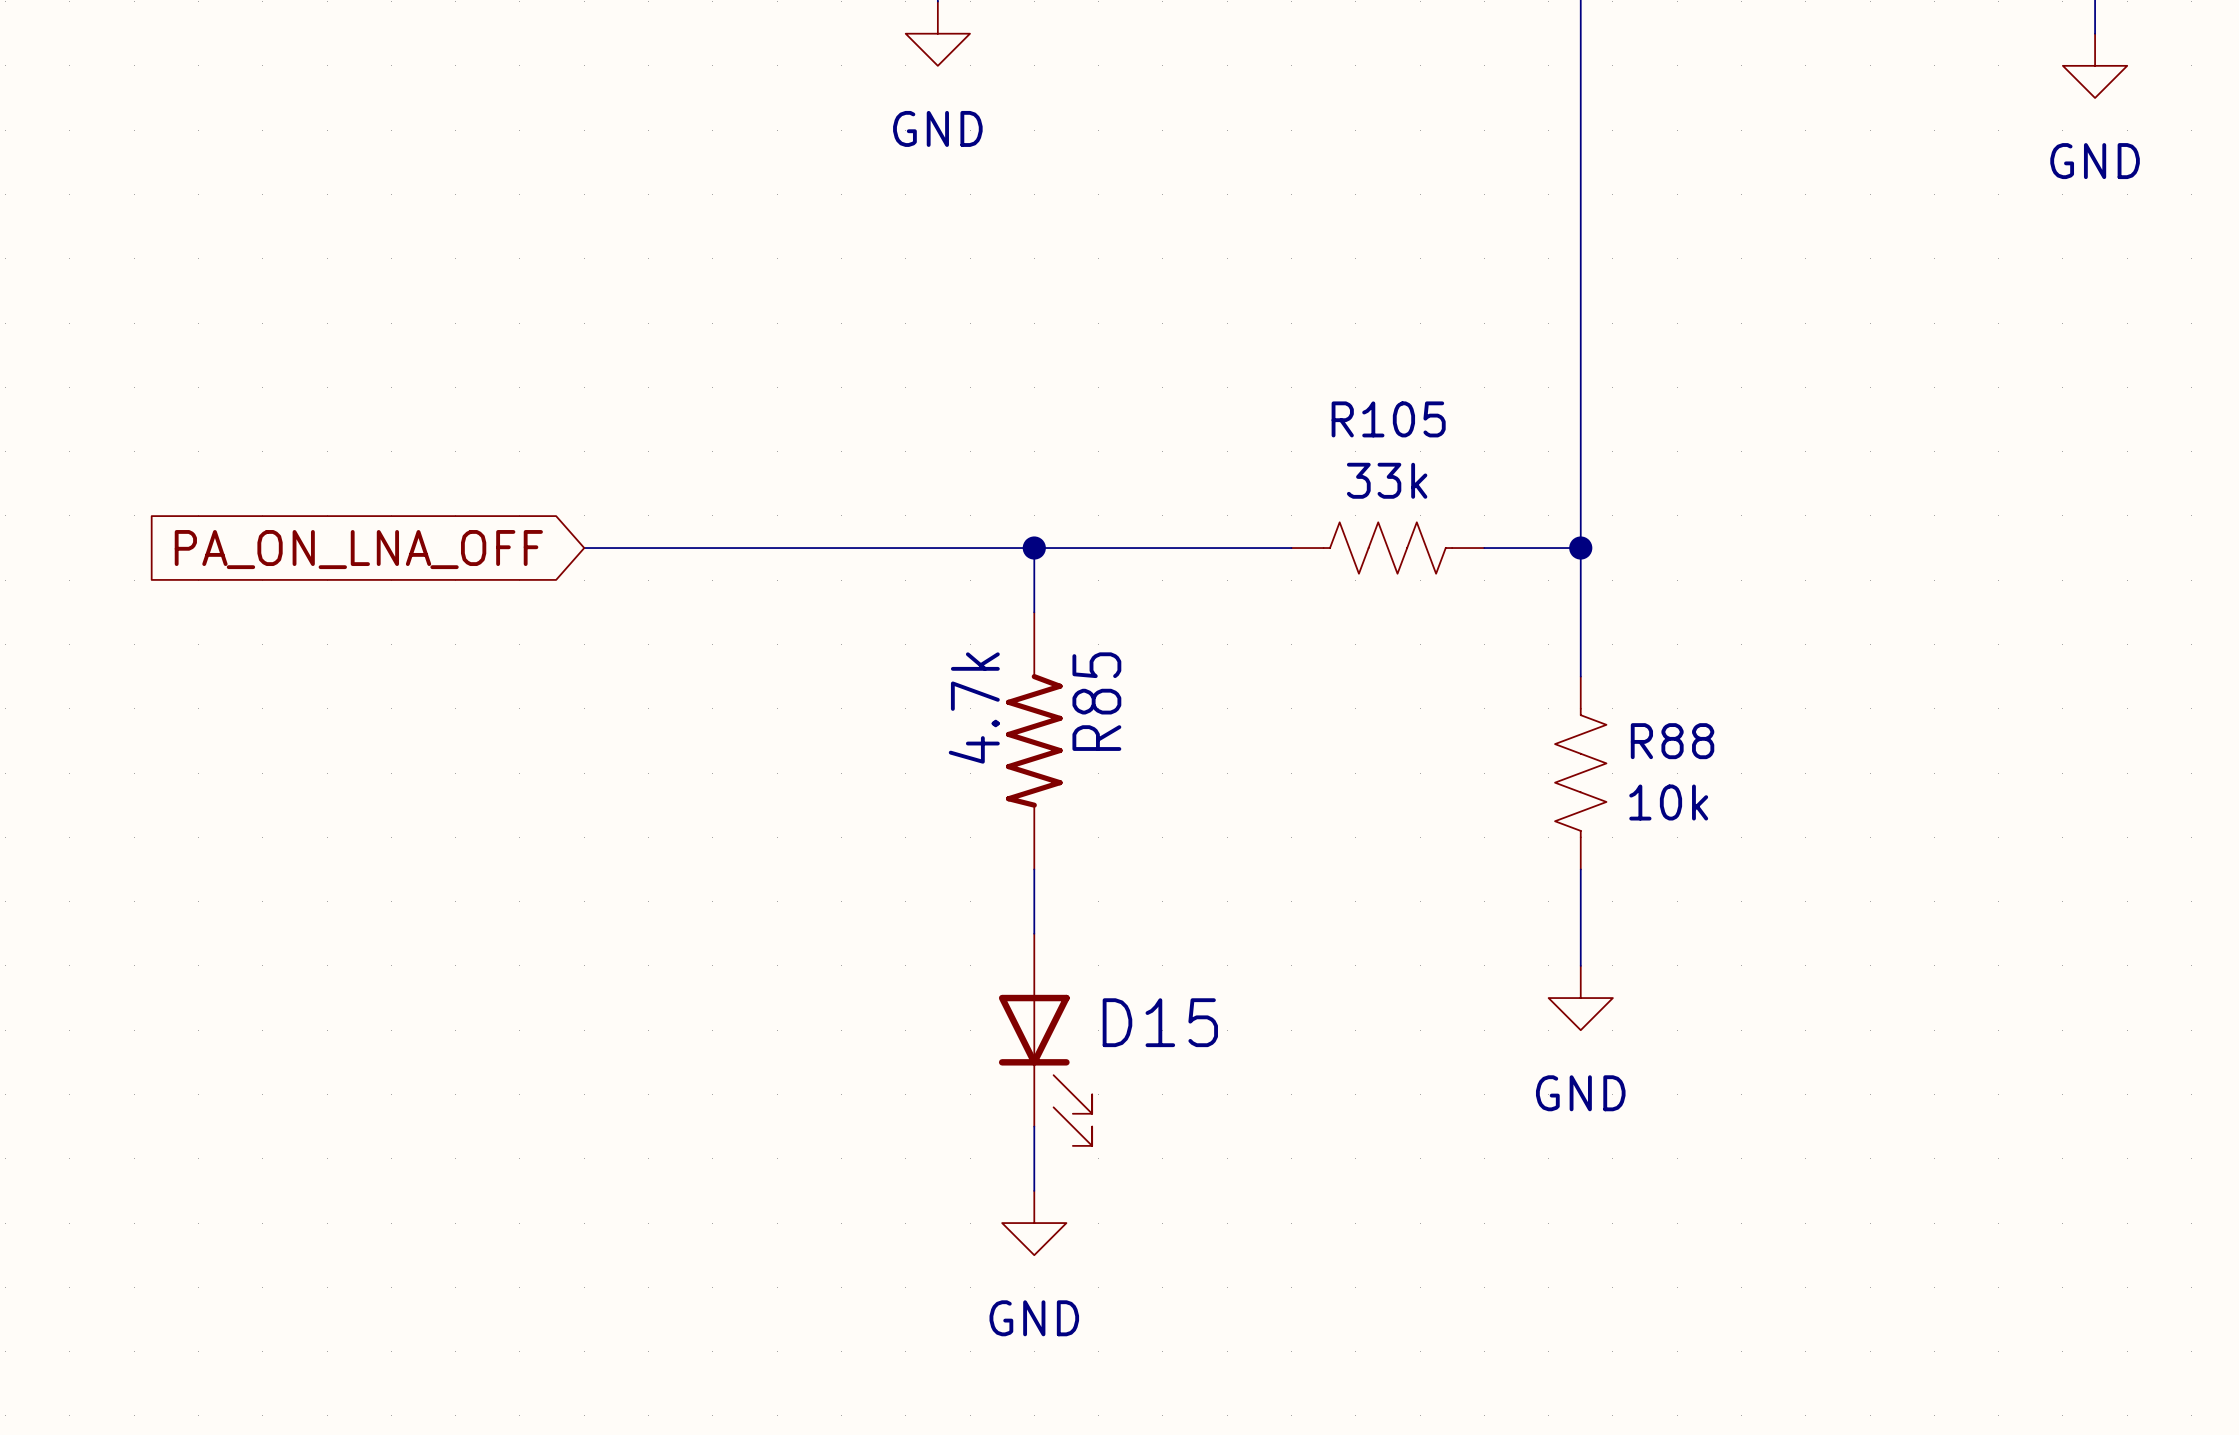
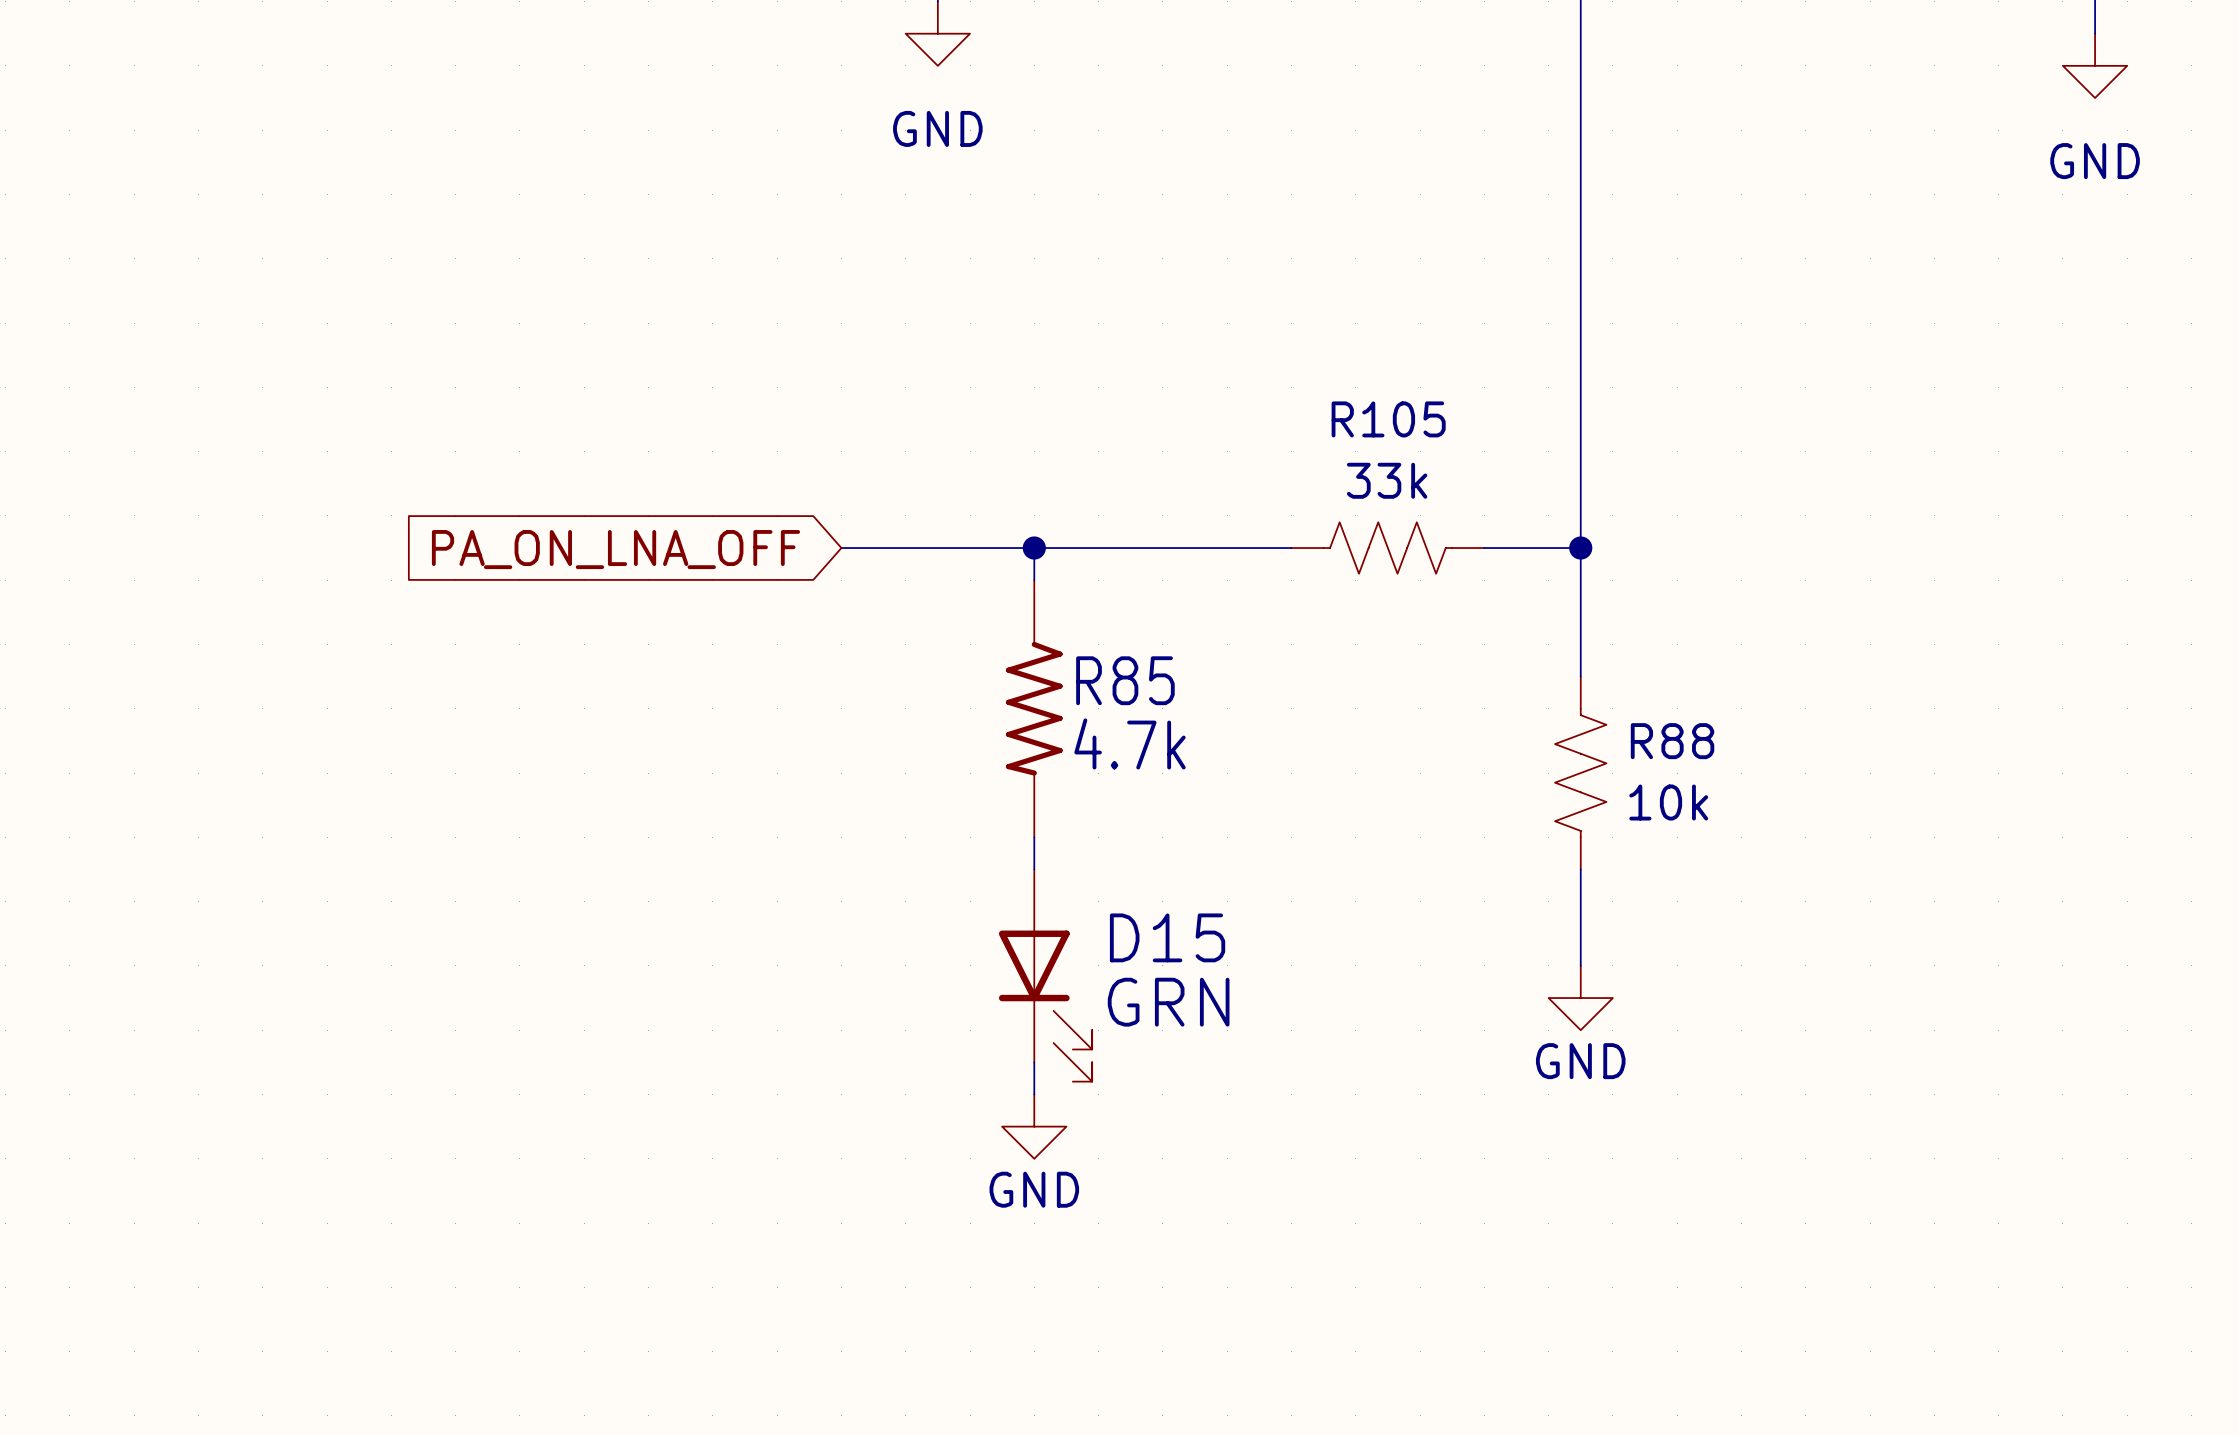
wire: (584, 548) (841, 548) -> none
global label position: PA_ON_LNA_OFF (358, 549) -> PA_ON_LNA_OFF (615, 549)
R85 name rotation: 0° (1096, 701) -> 90° clockwise (1125, 680)
R85 value rotation: 0° (974, 708) -> 90° clockwise (1129, 743)
R85 value position: 4.7k (974, 708) -> 4.7k (1129, 743)
R85 position: (1034, 740) -> (1034, 708)
D15 value: none -> GRN (1168, 1002)
D15 name position: D15 (1160, 1022) -> D15 (1167, 937)
D15 position: (1045, 1039) -> (1045, 975)
power symbol text position: GND (1580, 1093) -> GND (1580, 1061)
wire: (1034, 1126) (1034, 1190) -> none
power symbol position: GND (1034, 1223) -> GND (1034, 1126)
power symbol text position: GND (1034, 1318) -> GND (1034, 1189)

